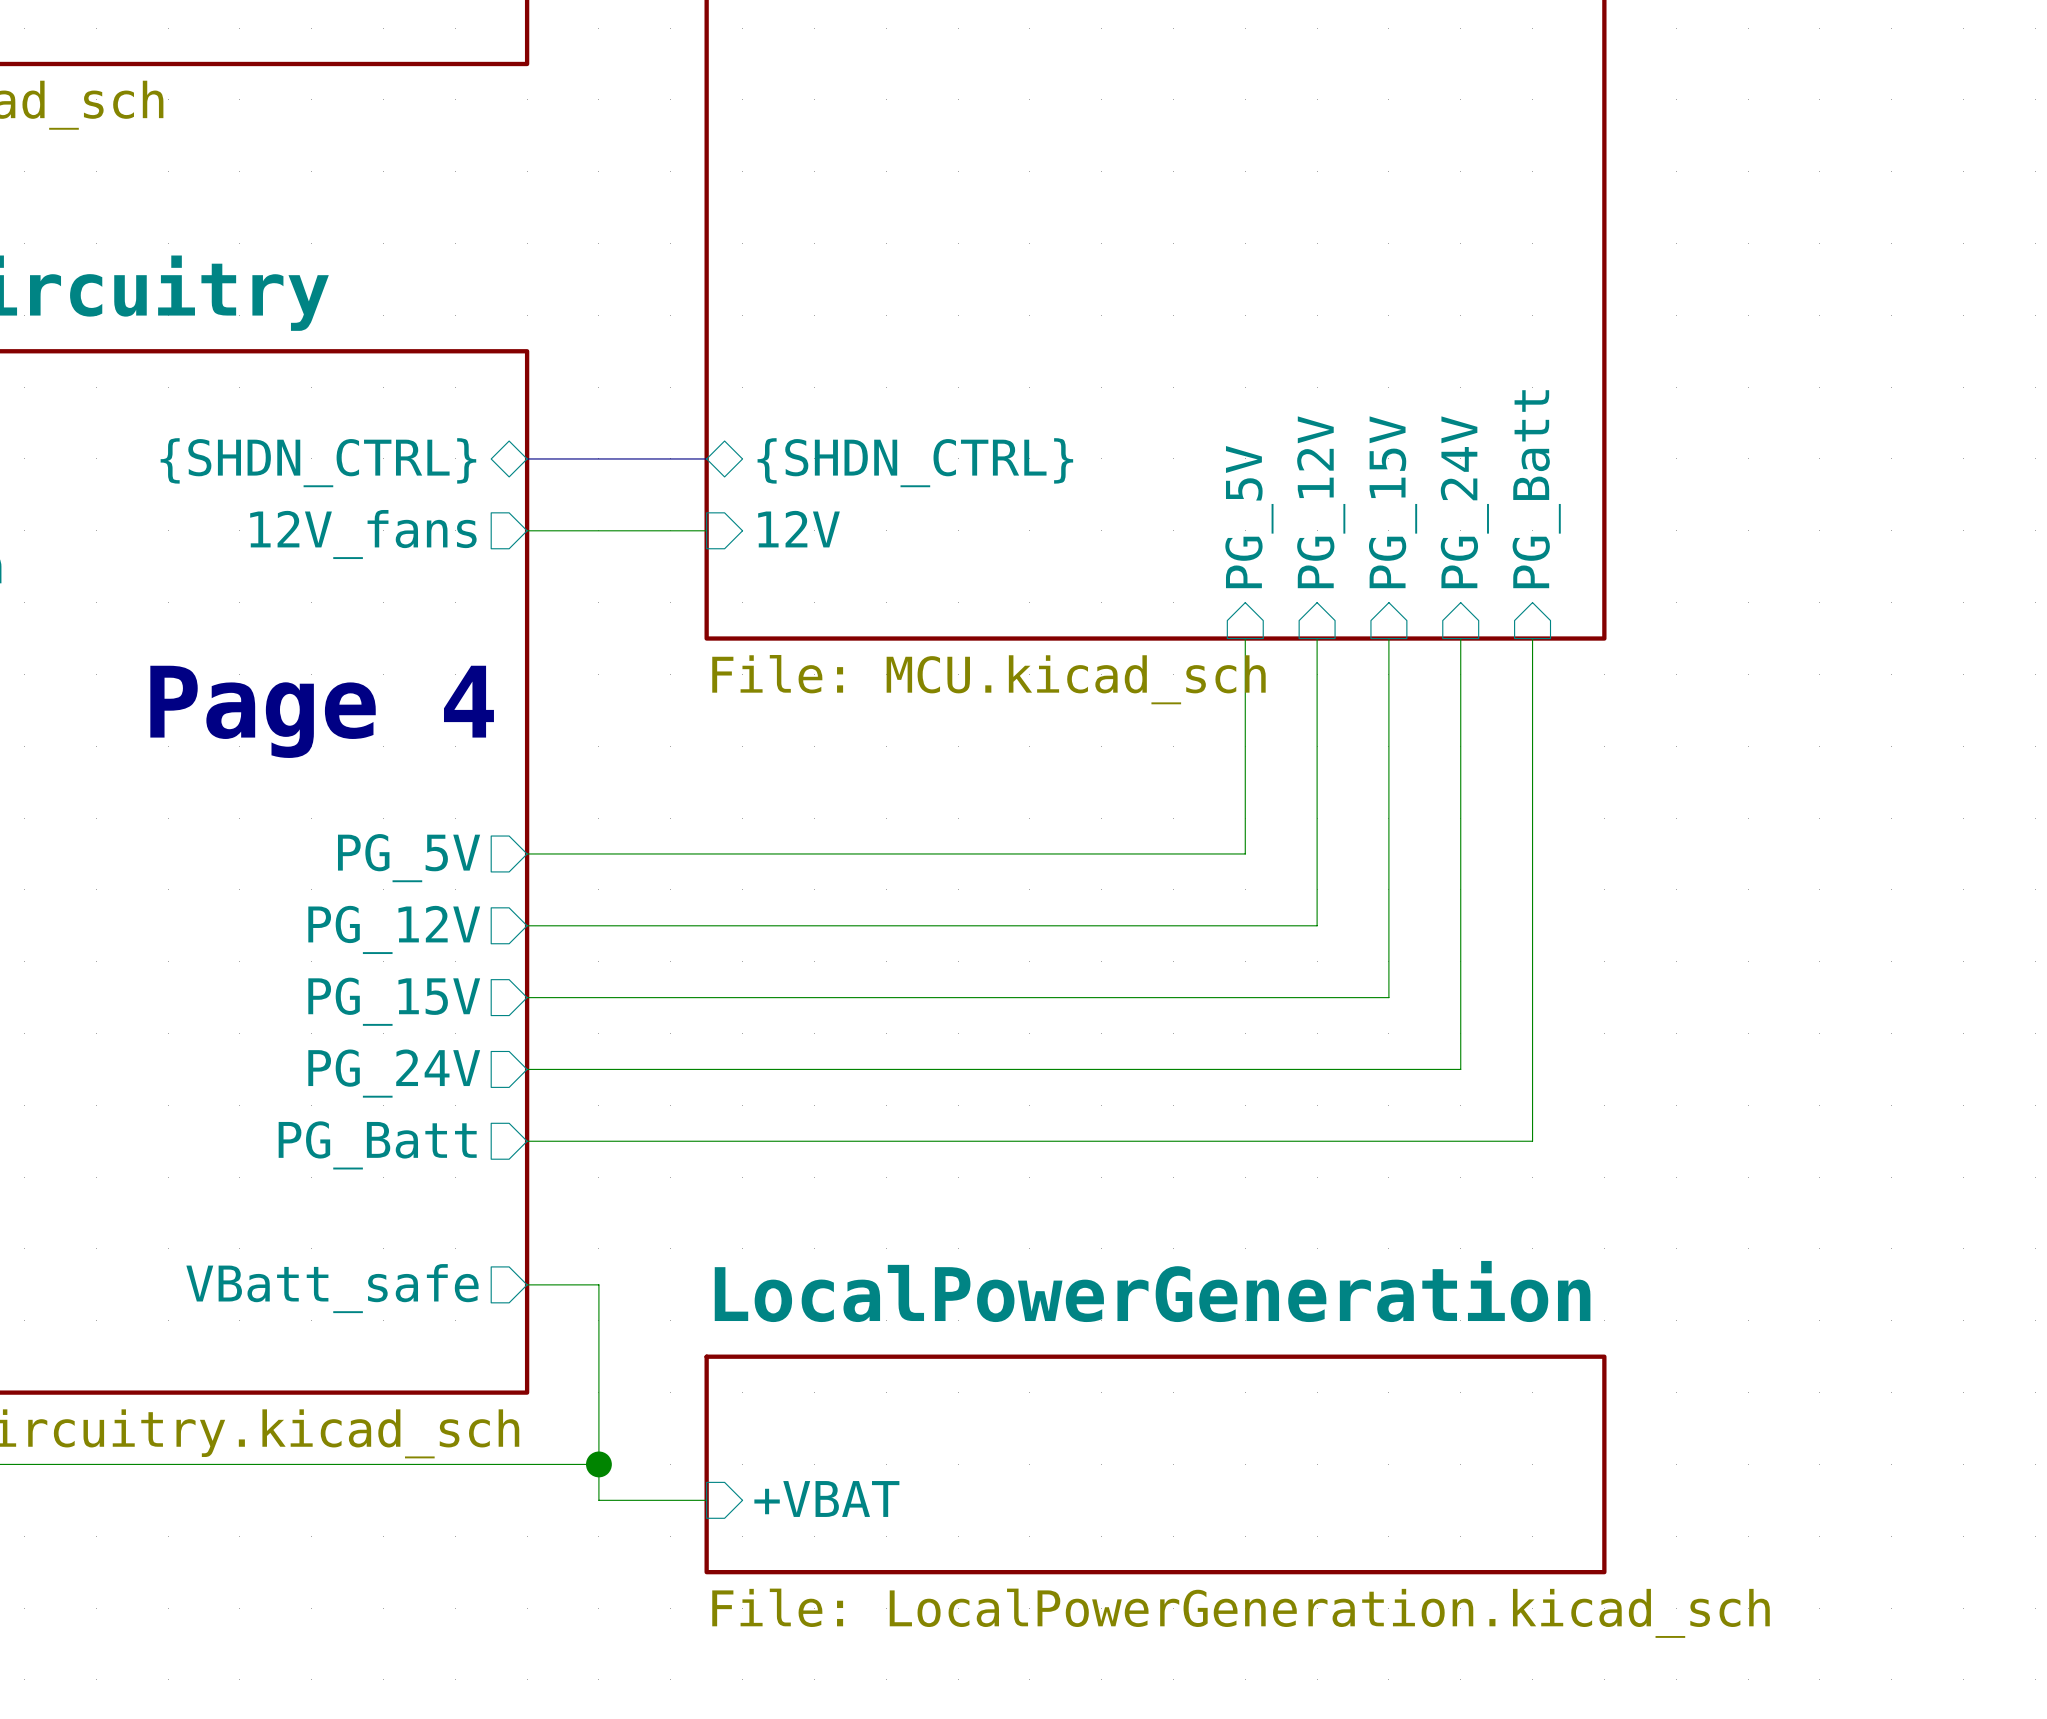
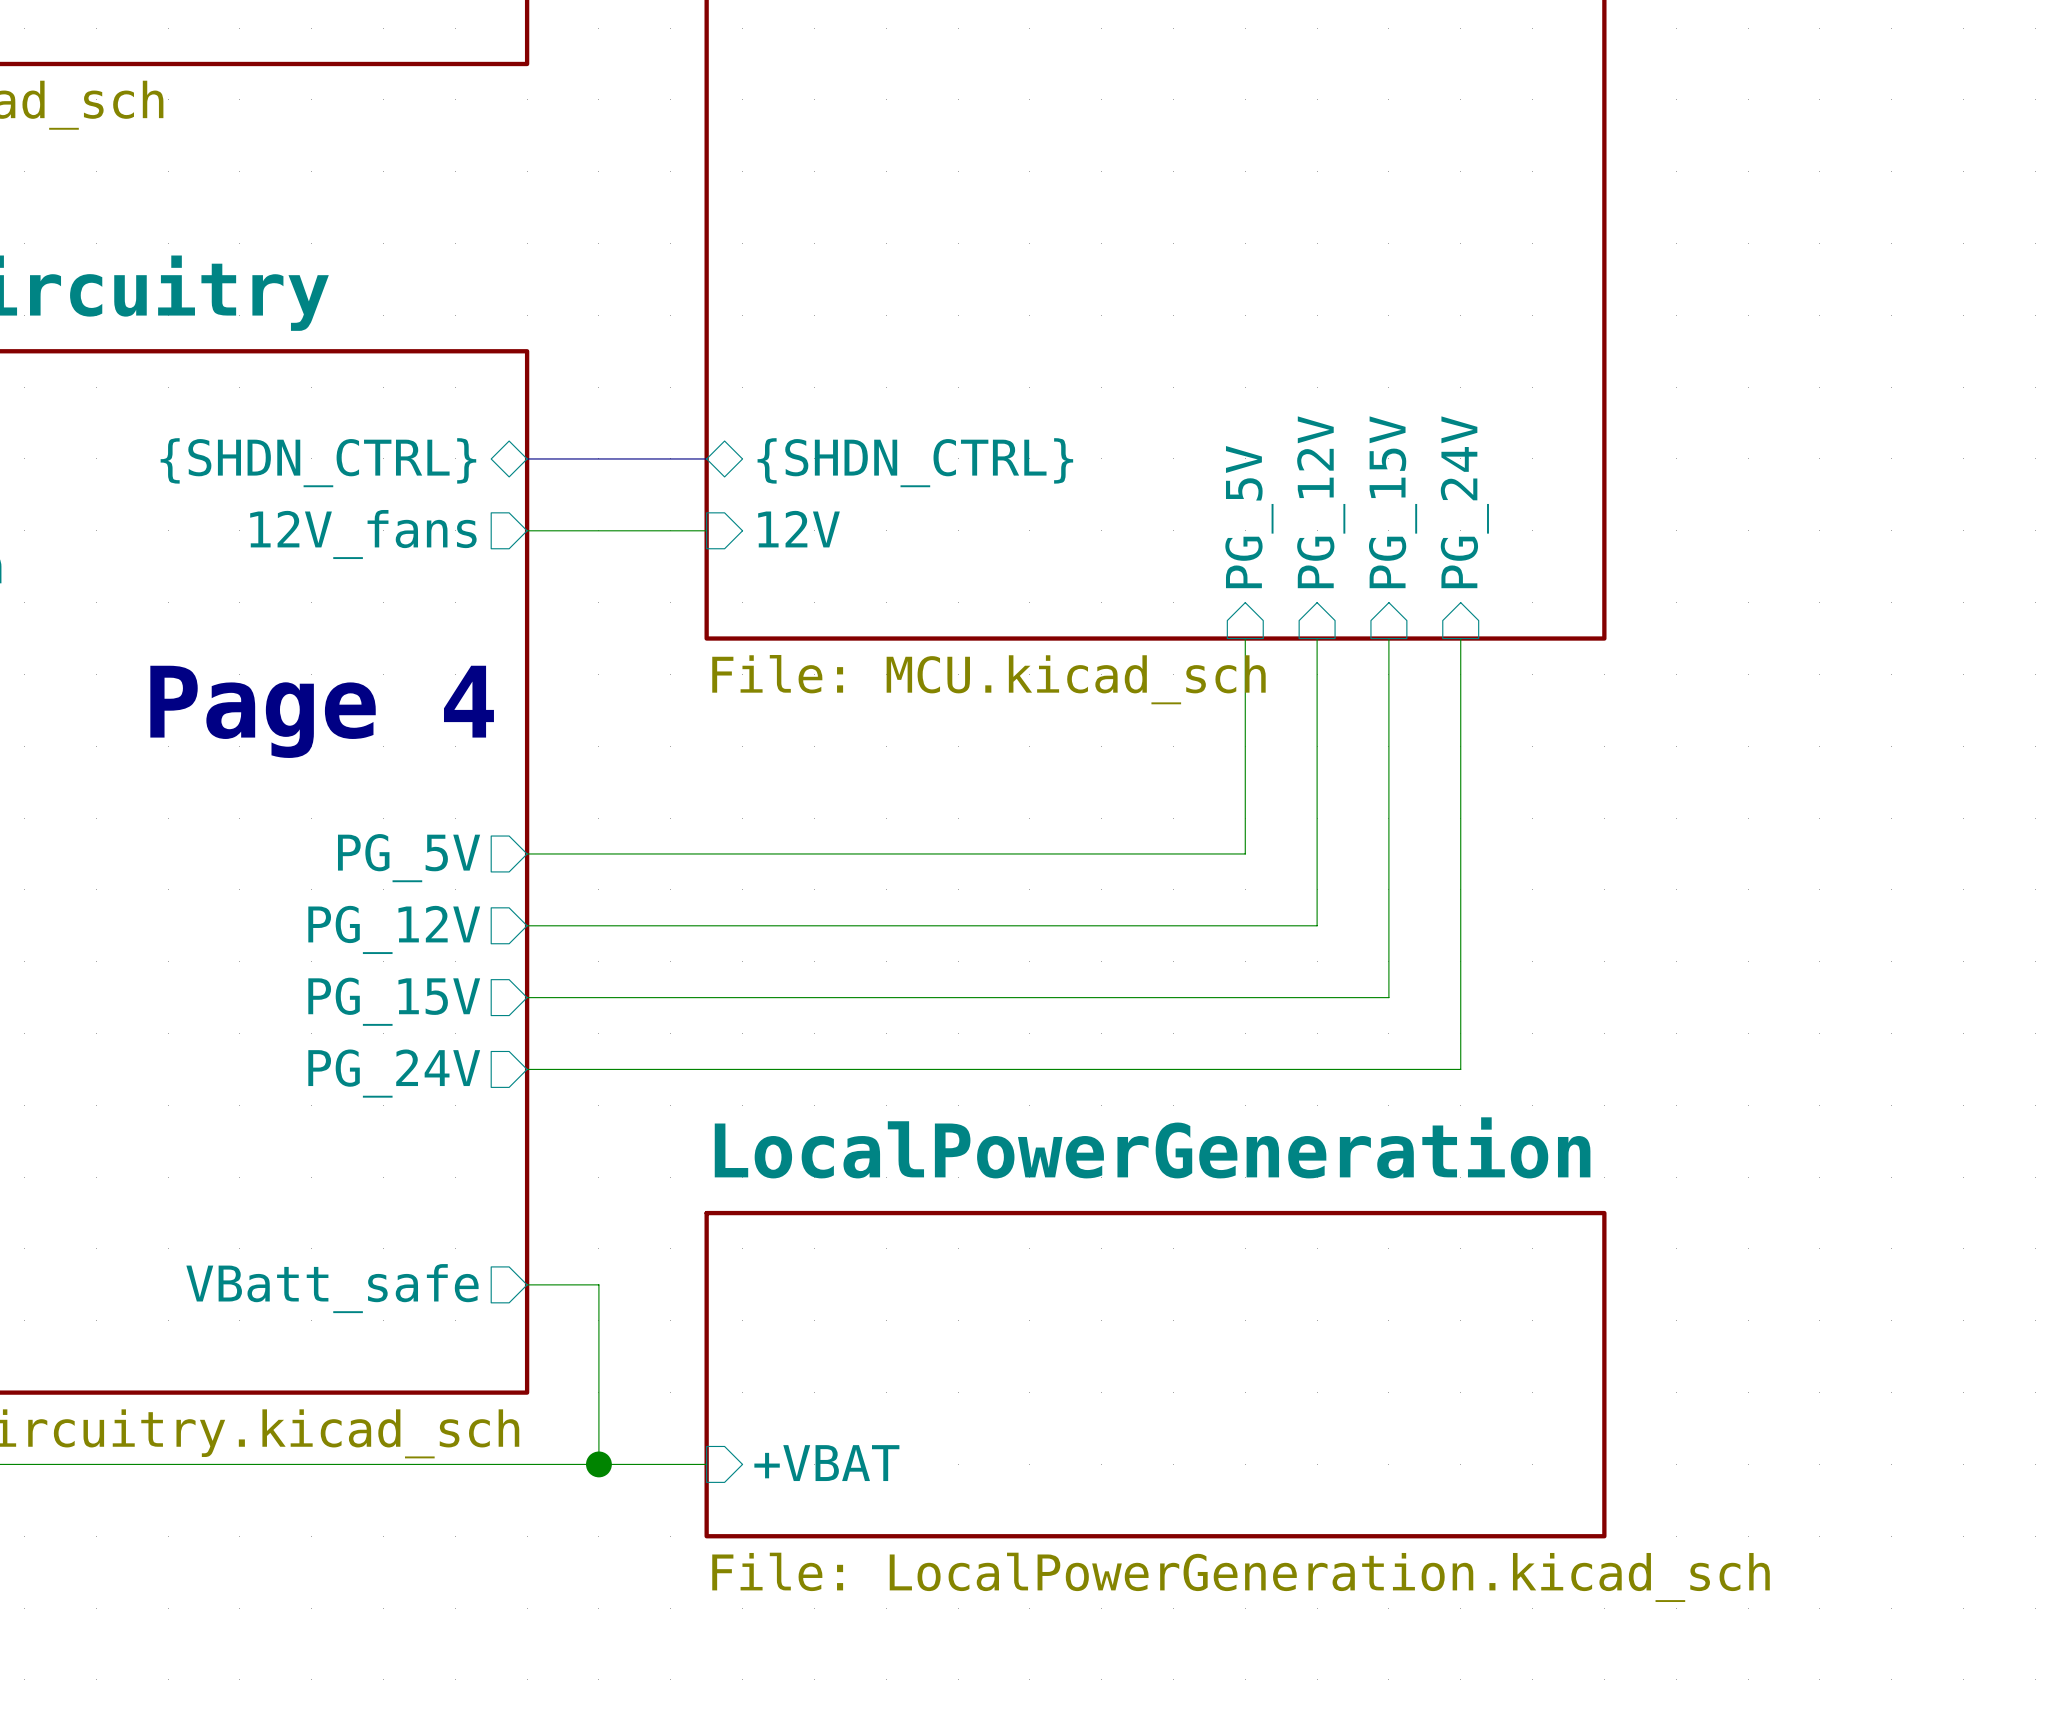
sheet pin: PG_Batt (1536, 489) -> none
wire: (1532, 638) (1532, 1141) (527, 1141) -> none
sheet pin: PG_Batt (377, 1145) -> none
sheet LocalPowerGeneration: none -> File: LocalPowerGeneration.kicad_sch (1155, 1374)
wire: (598, 1464) (598, 1500) (706, 1500) -> (598, 1464) (706, 1464)
sheet LocalPowerGeneration: File: LocalPowerGeneration.kicad_sch (1155, 1464) -> none
sheet pin position: +VBAT (826, 1498) -> +VBAT (826, 1463)

